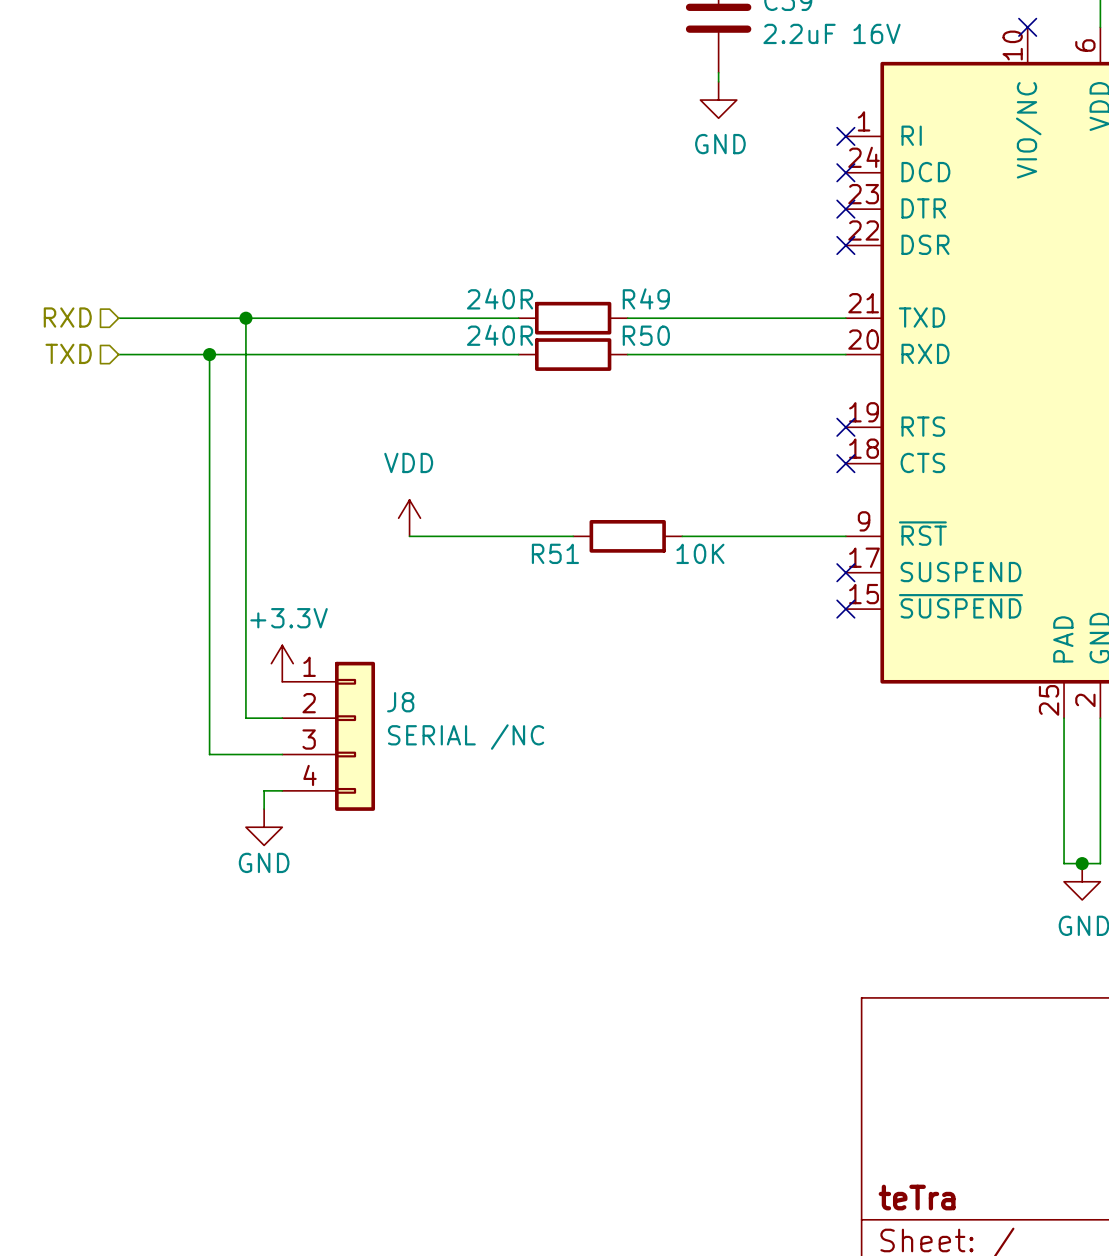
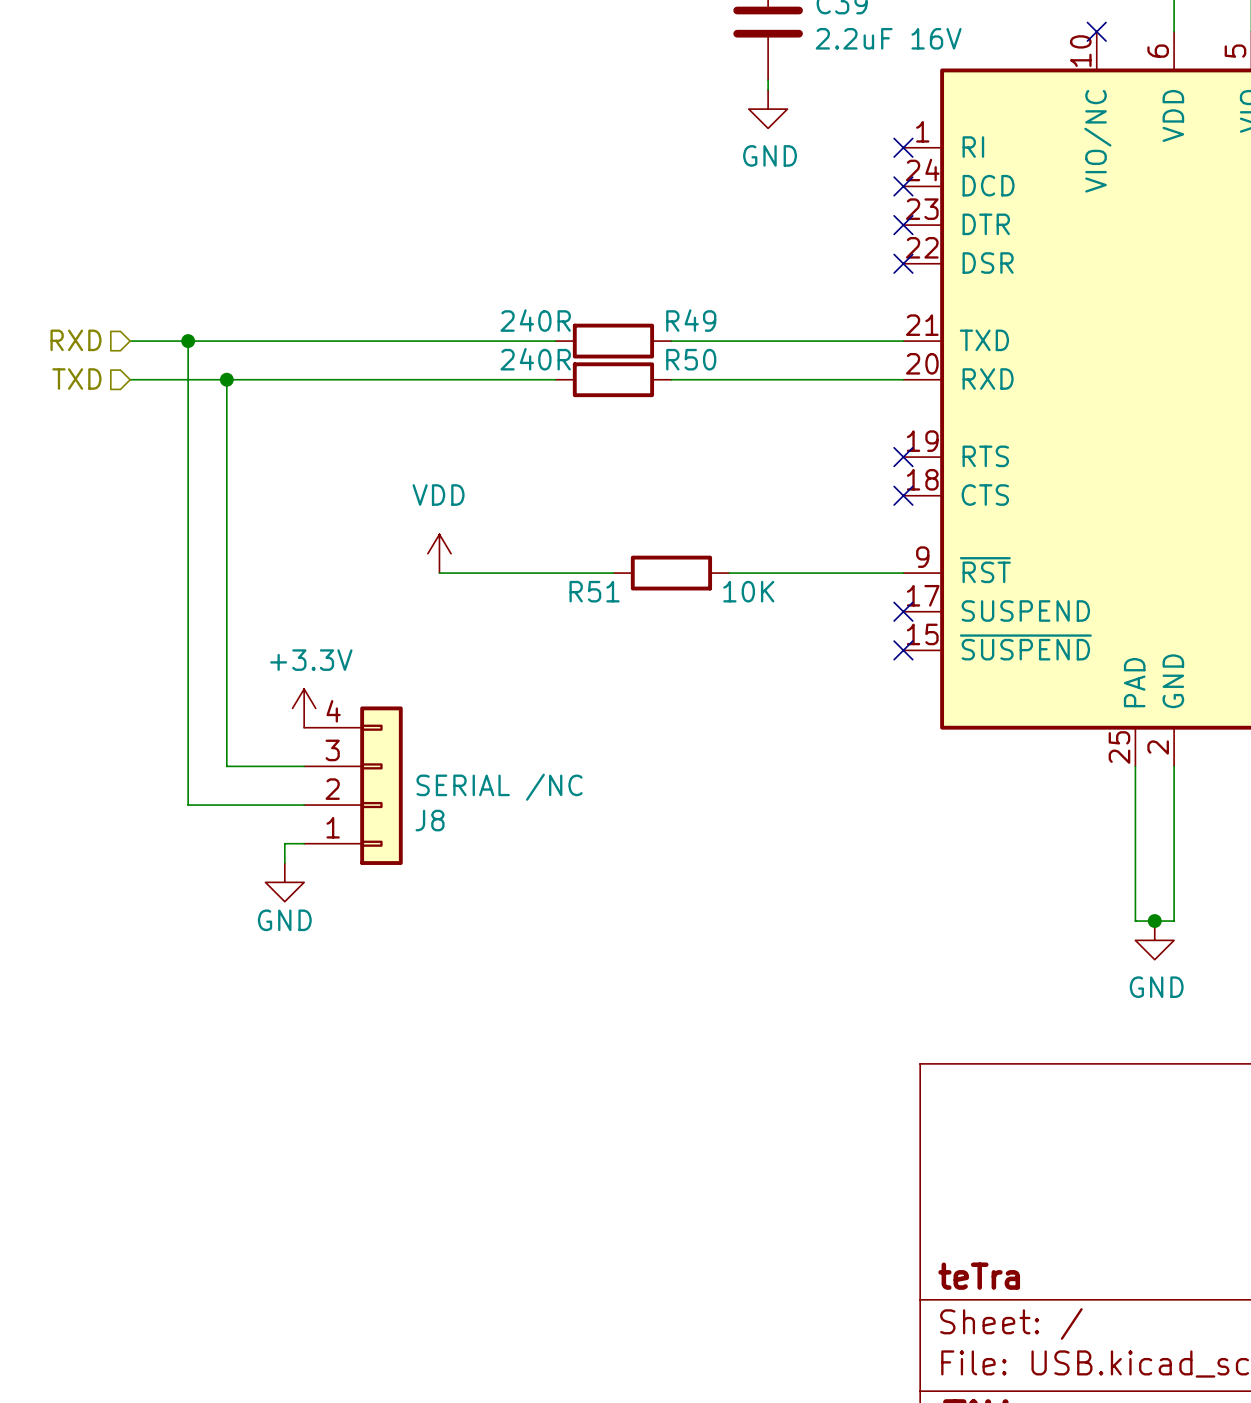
wire: none -> (188, 341) (188, 805) (226, 805)
wire: (245, 318) (245, 718) -> none
junction position: (245, 318) -> (188, 341)
wire: (209, 718) (209, 754) -> (226, 766) (265, 766)
J8 flip: as is (355, 736) -> up-down (381, 785)

